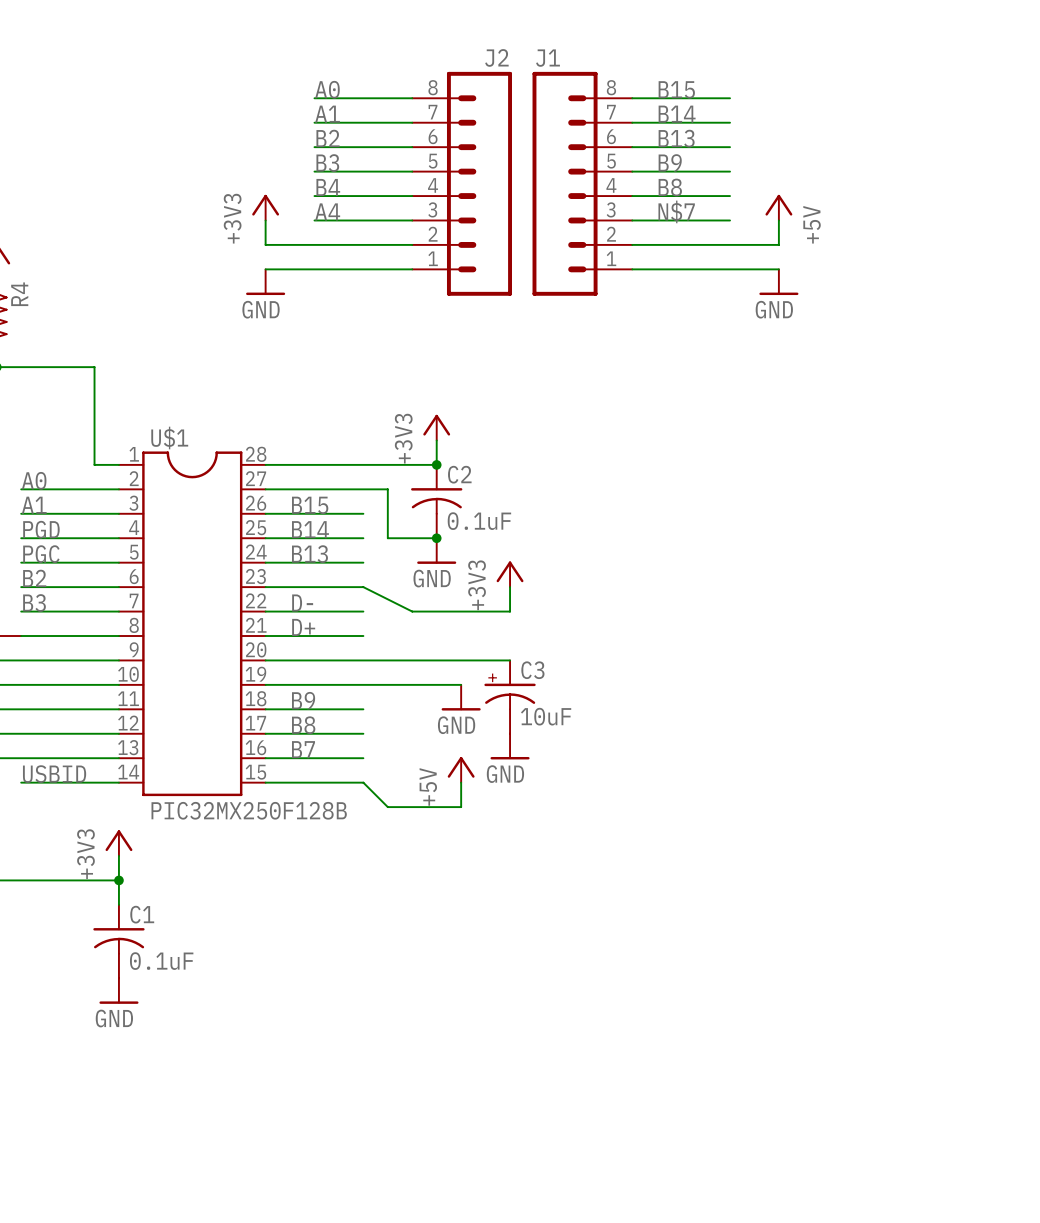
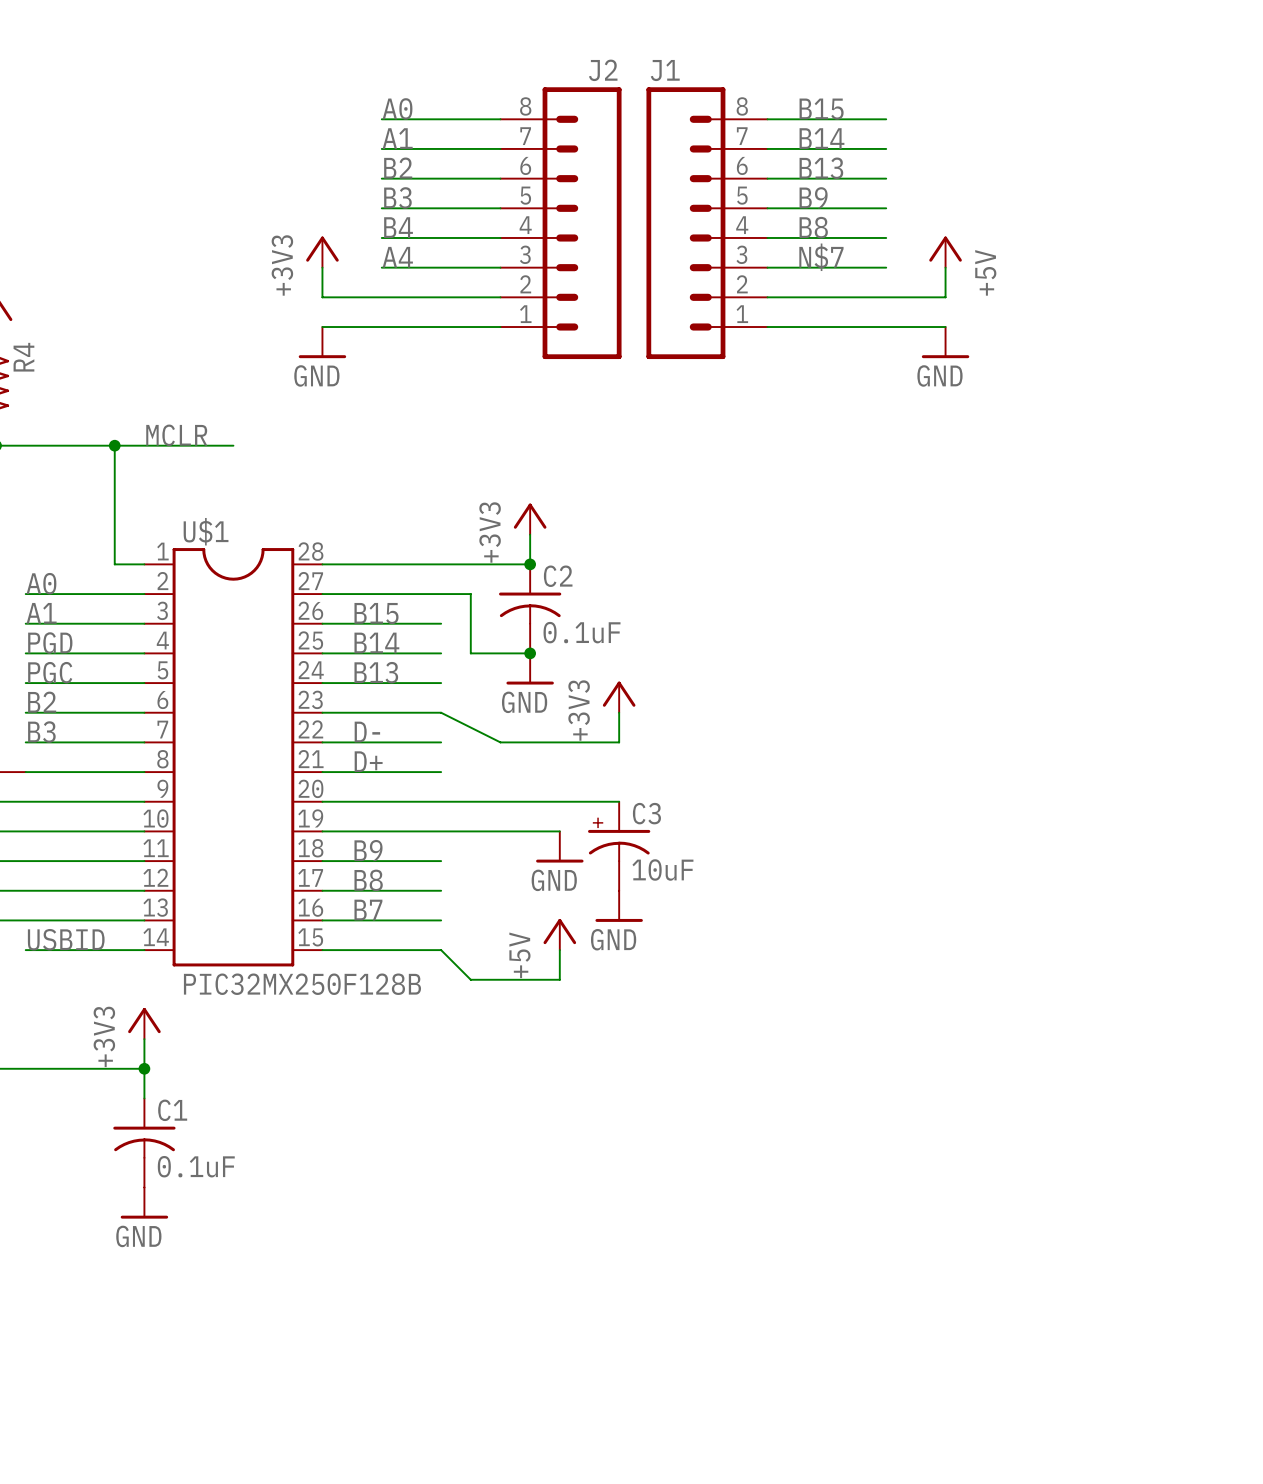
label: none -> MCLR (176, 435)
wire: none -> (114, 445) (233, 445)
junction: none -> (114, 445)

